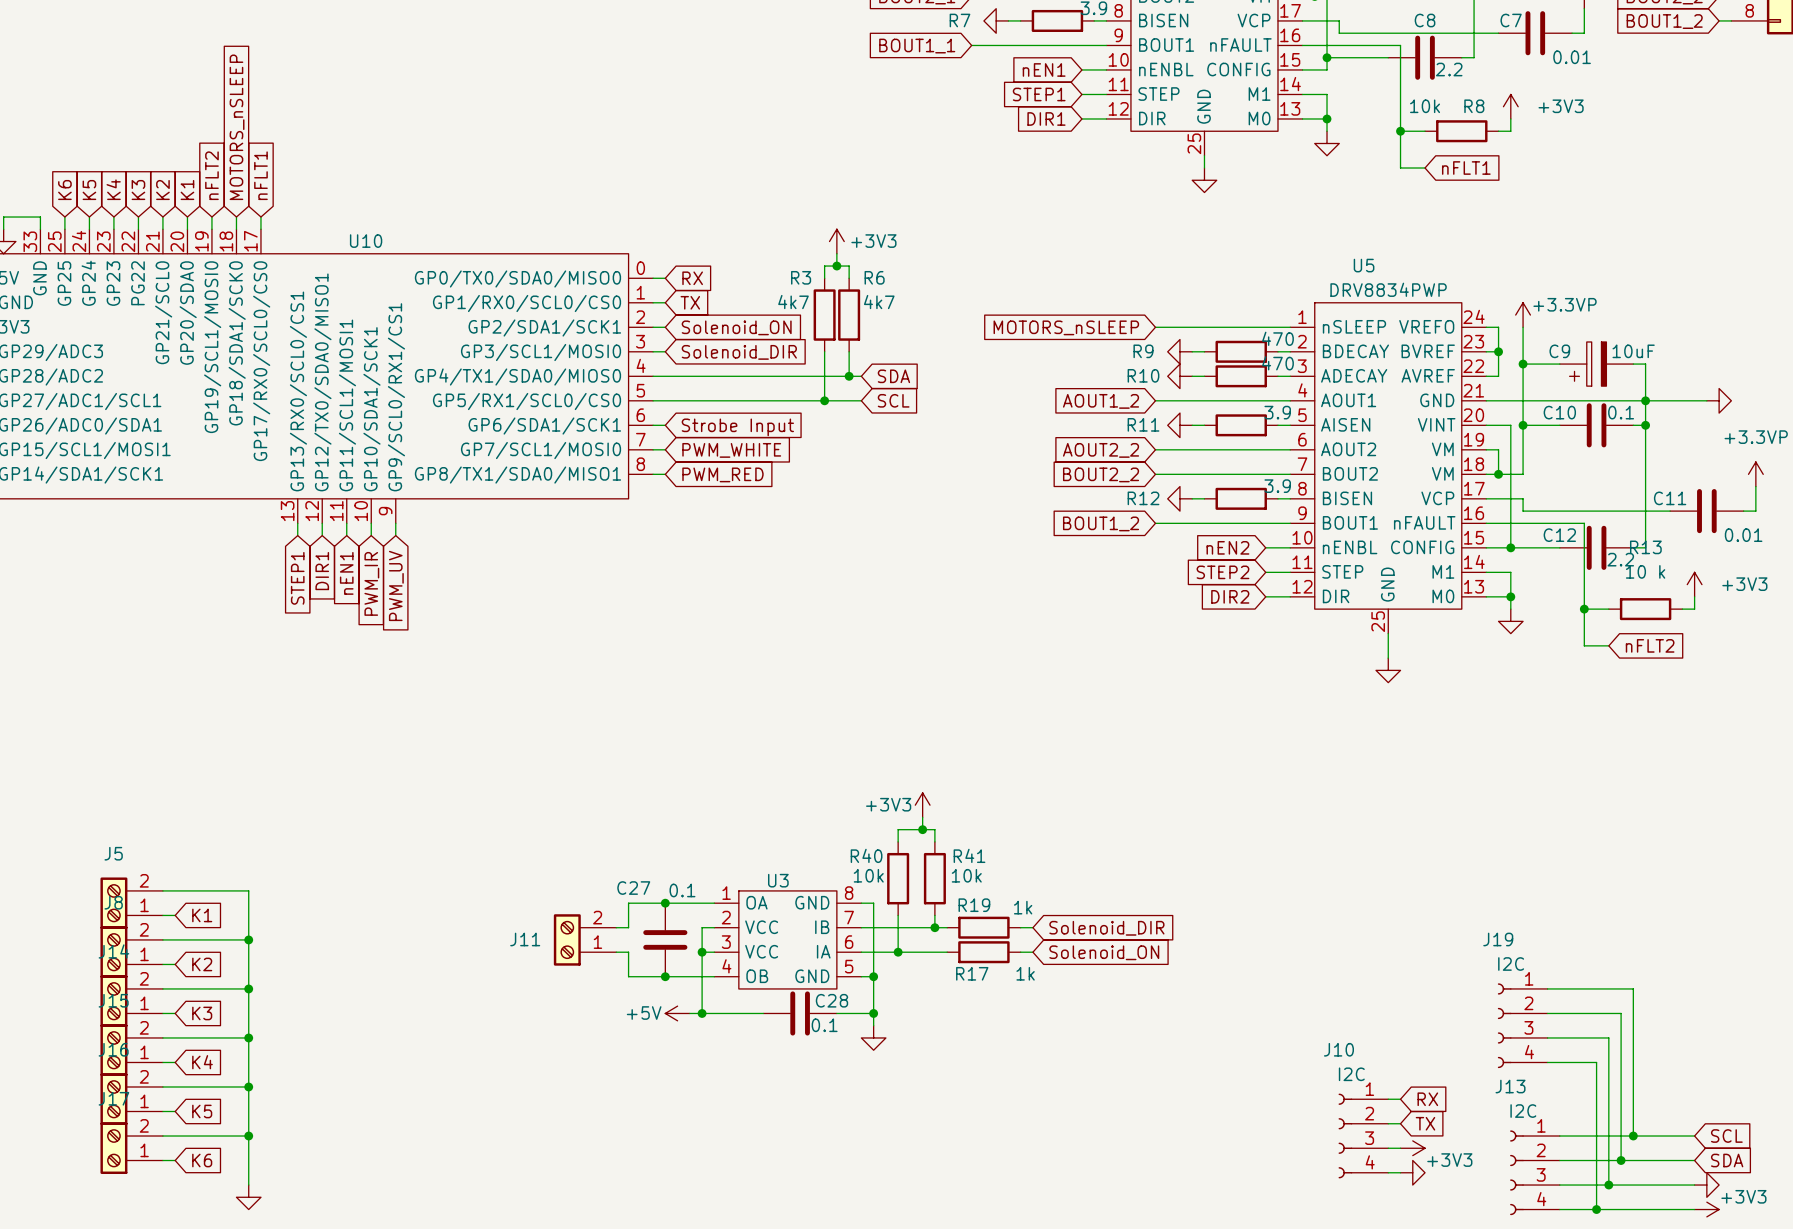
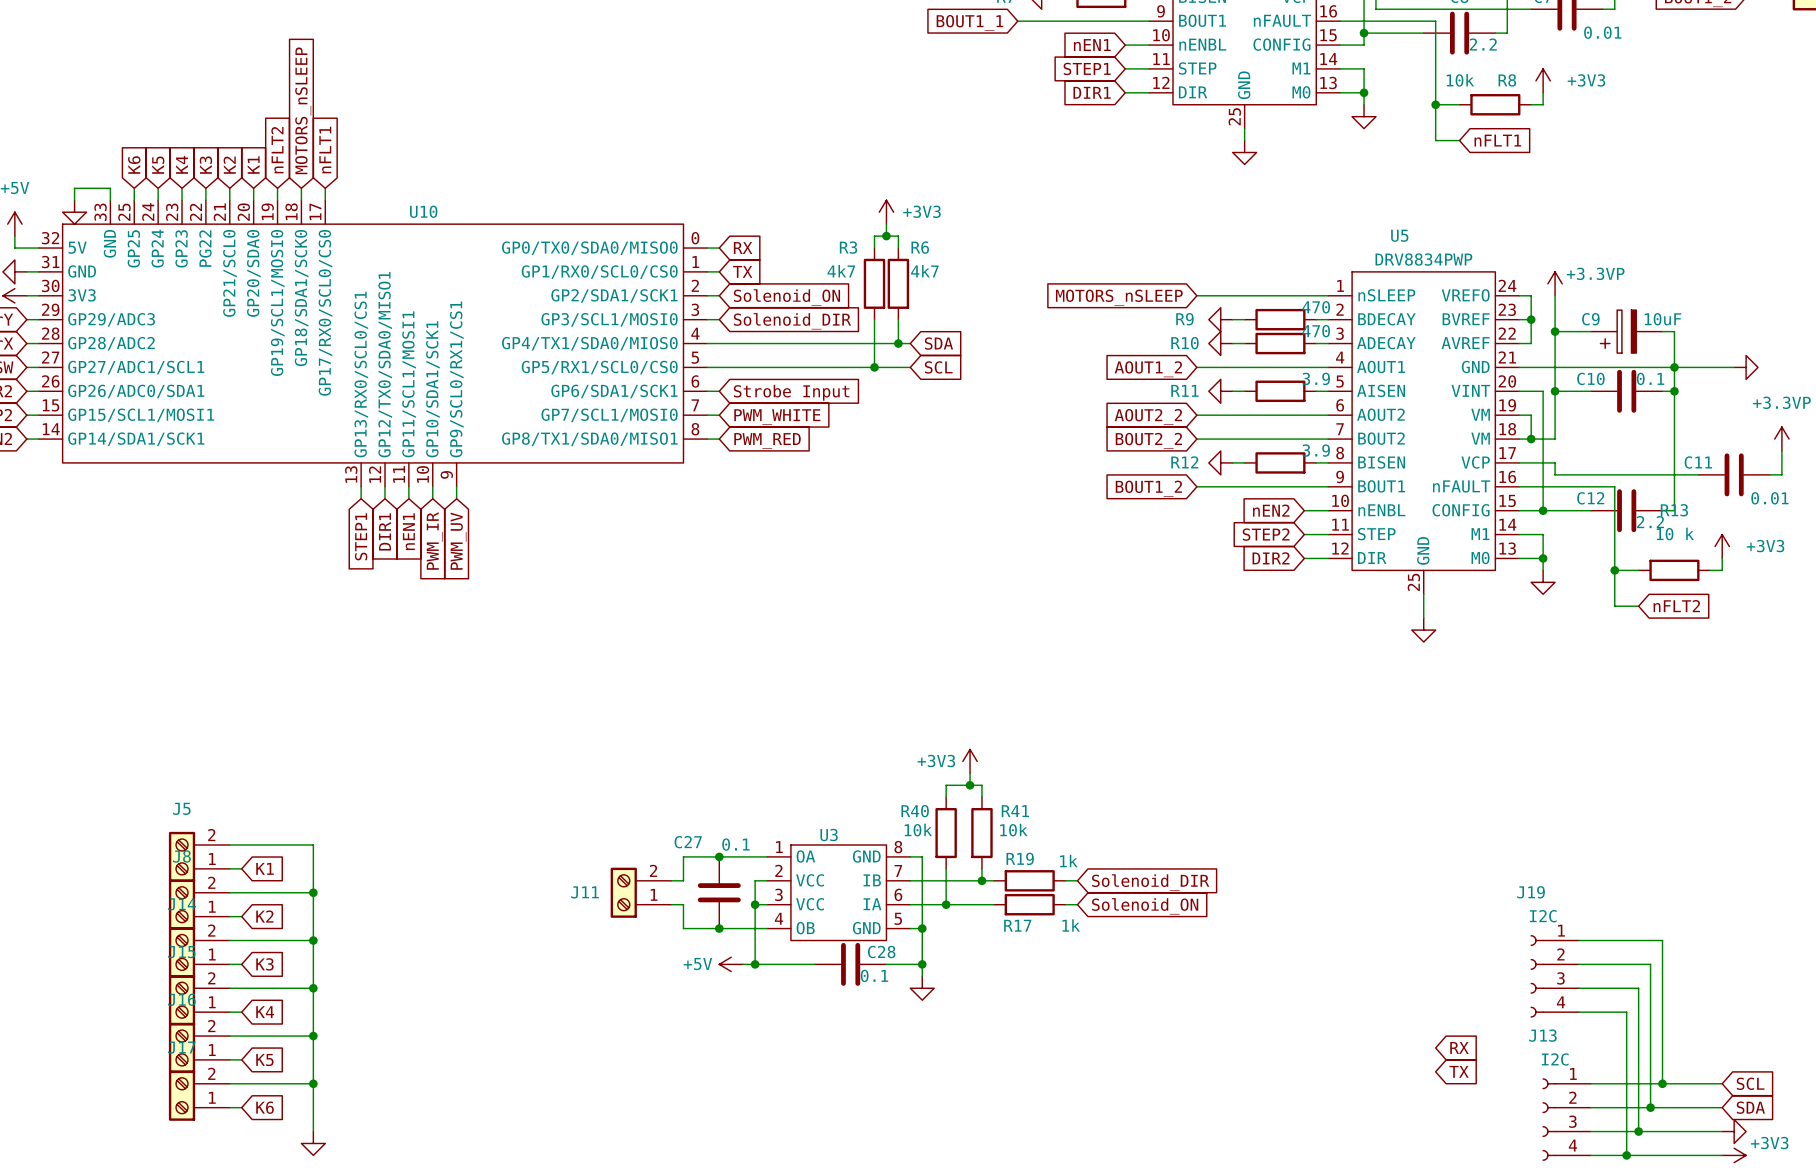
wire: (1388, 1099) (1400, 1099) -> none
wire: (1388, 1123) (1400, 1123) -> none
J10: I2C (1363, 1136) -> none
wire: (1388, 1148) (1400, 1148) -> none
power symbol: +3V3 (1412, 1148) -> none
wire: (1388, 1172) (1400, 1172) -> none
power symbol: (1412, 1172) -> none

